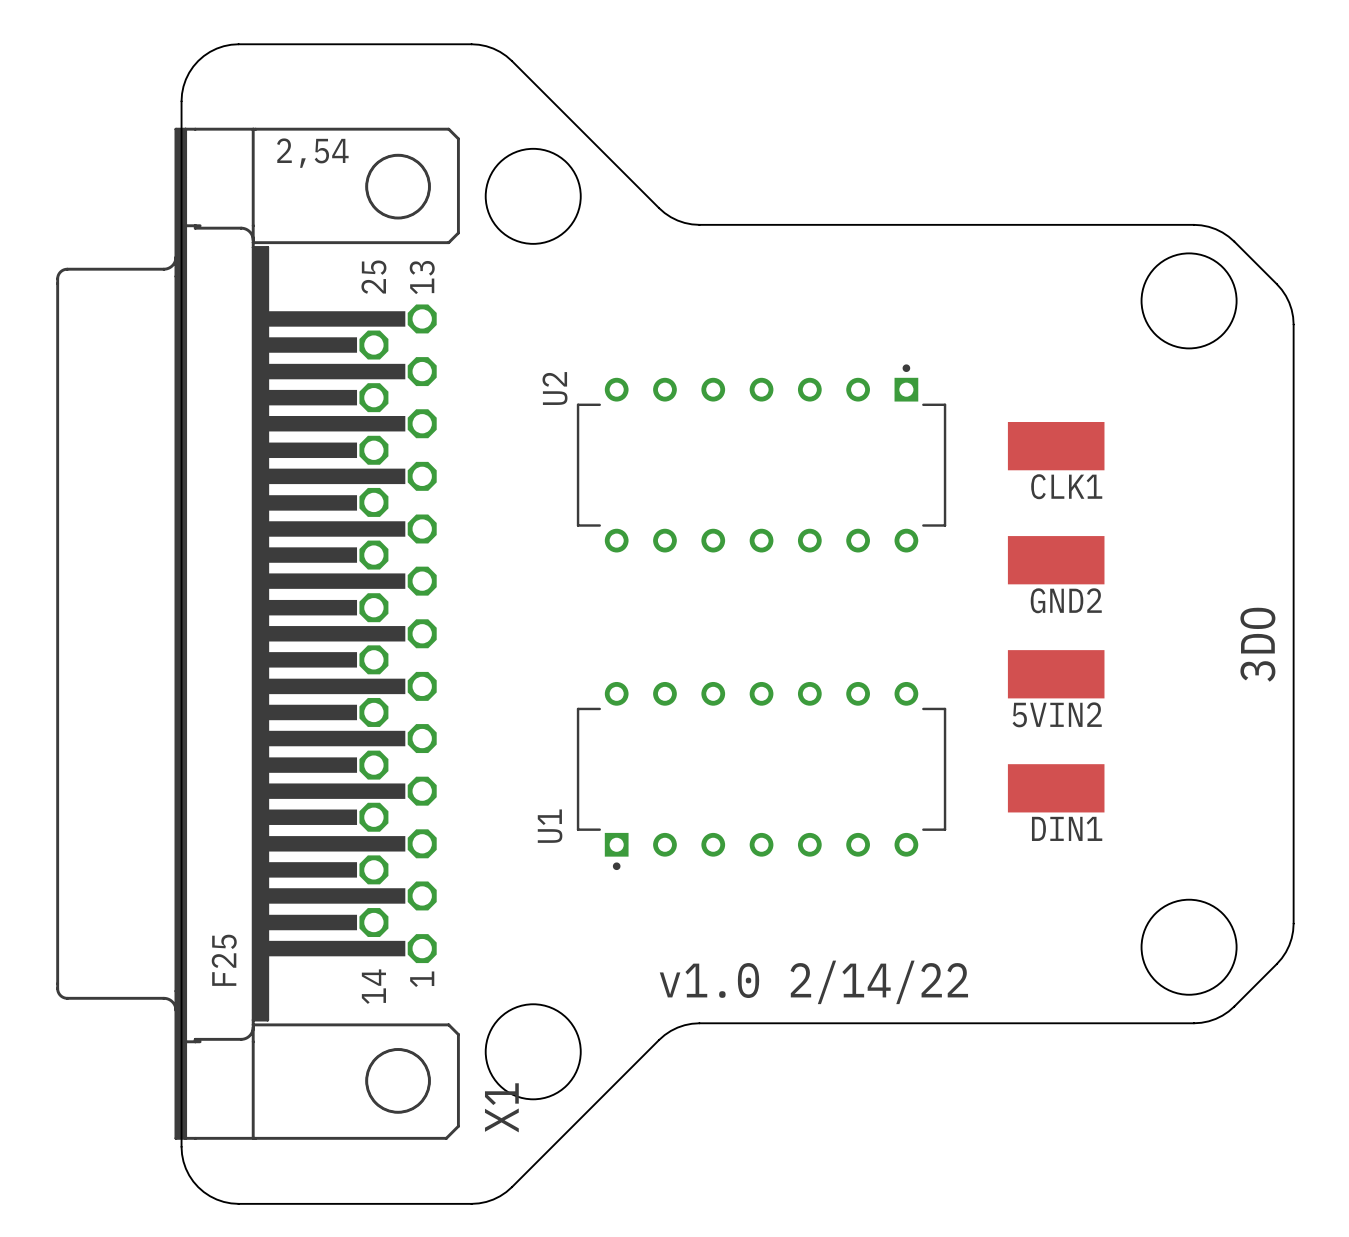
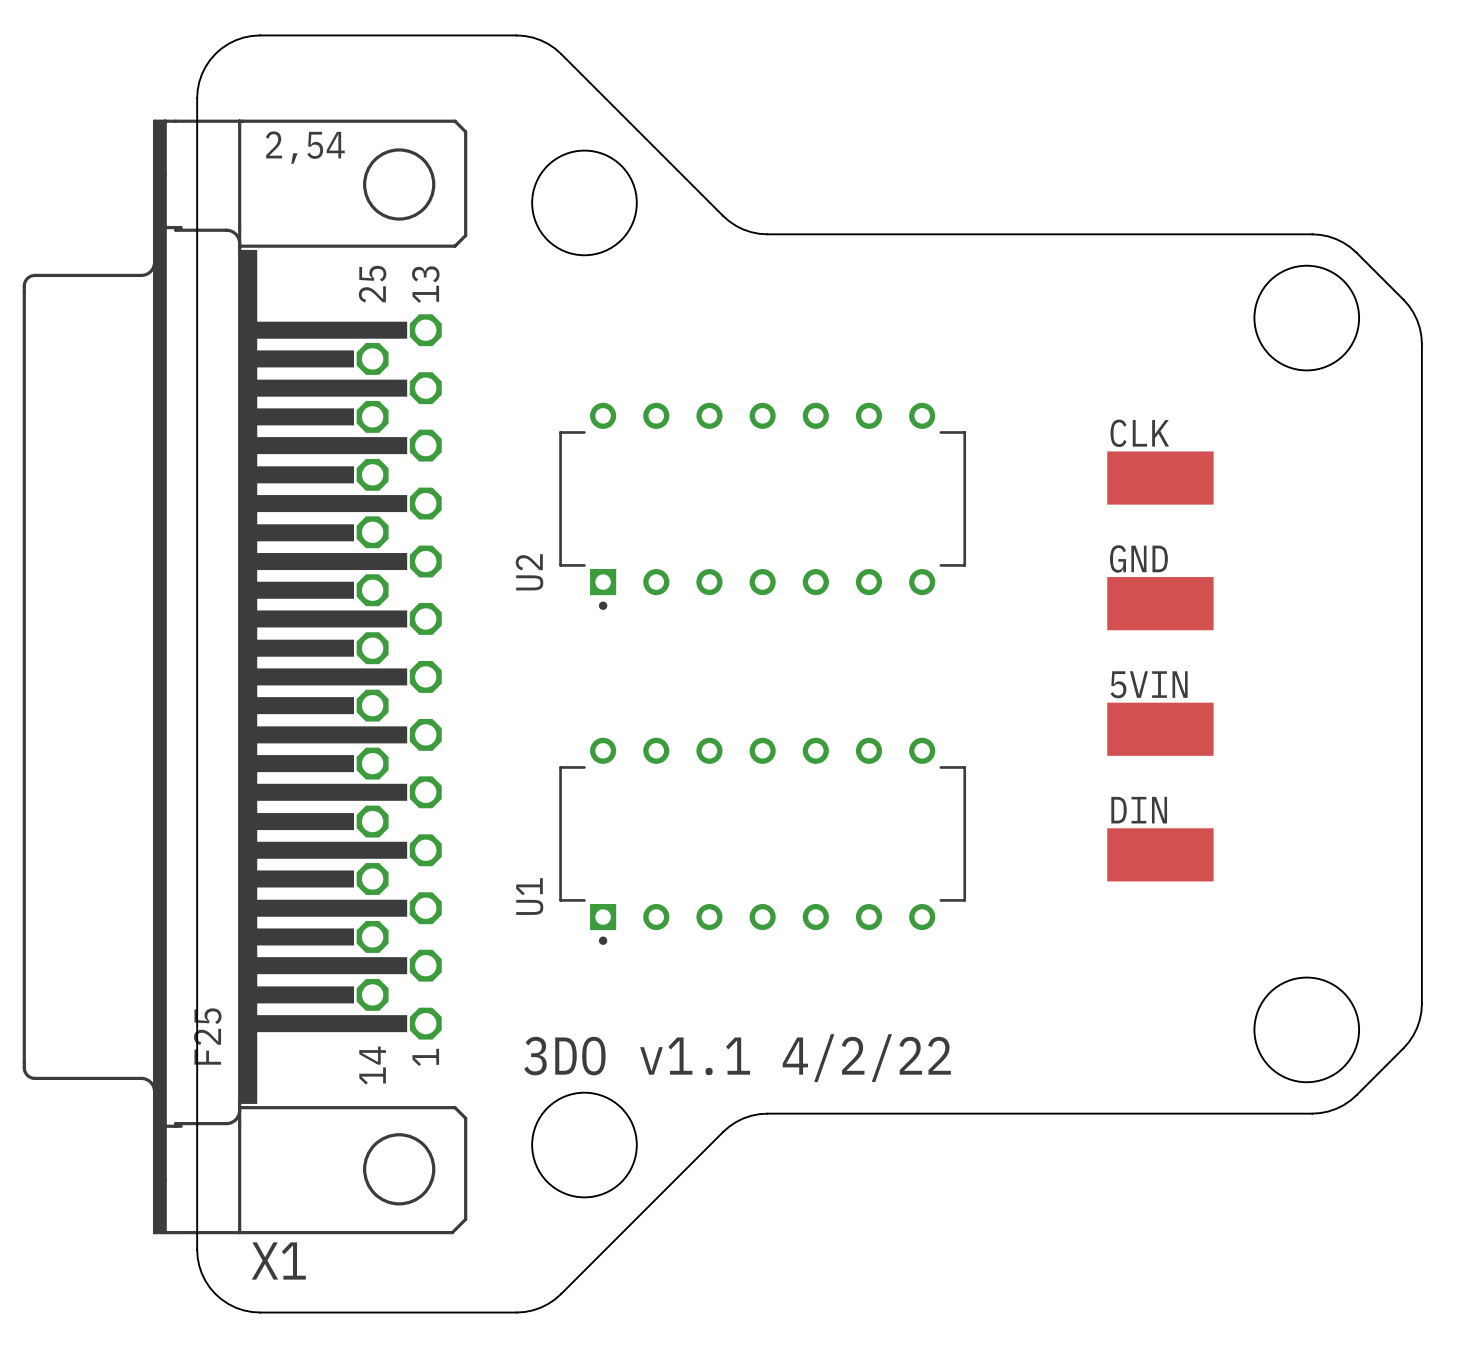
U2 name position: U2 (554, 388) -> U2 (529, 572)
U2 rotation: 0° (761, 458) -> 180° (762, 506)
CLK1 name: CLK1 (1066, 486) -> CLK (1139, 433)
GND2 name: GND2 (1066, 600) -> GND (1138, 558)
X1 position: (258, 633) -> (244, 676)
text: 3DO (1257, 644) -> none
5VIN2 name: 5VIN2 (1057, 714) -> 5VIN (1149, 684)
U1 position: (761, 776) -> (762, 841)
DIN1 name: DIN1 (1067, 828) -> DIN (1139, 810)
text: none -> 3DO v1.1 4/2/22 (737, 1058)
text: v1.0 2/14/22 (813, 982) -> none
X1 name rotation: 0° (501, 1107) -> 90° clockwise (278, 1261)
X1 name position: X1 (501, 1107) -> X1 (278, 1261)

